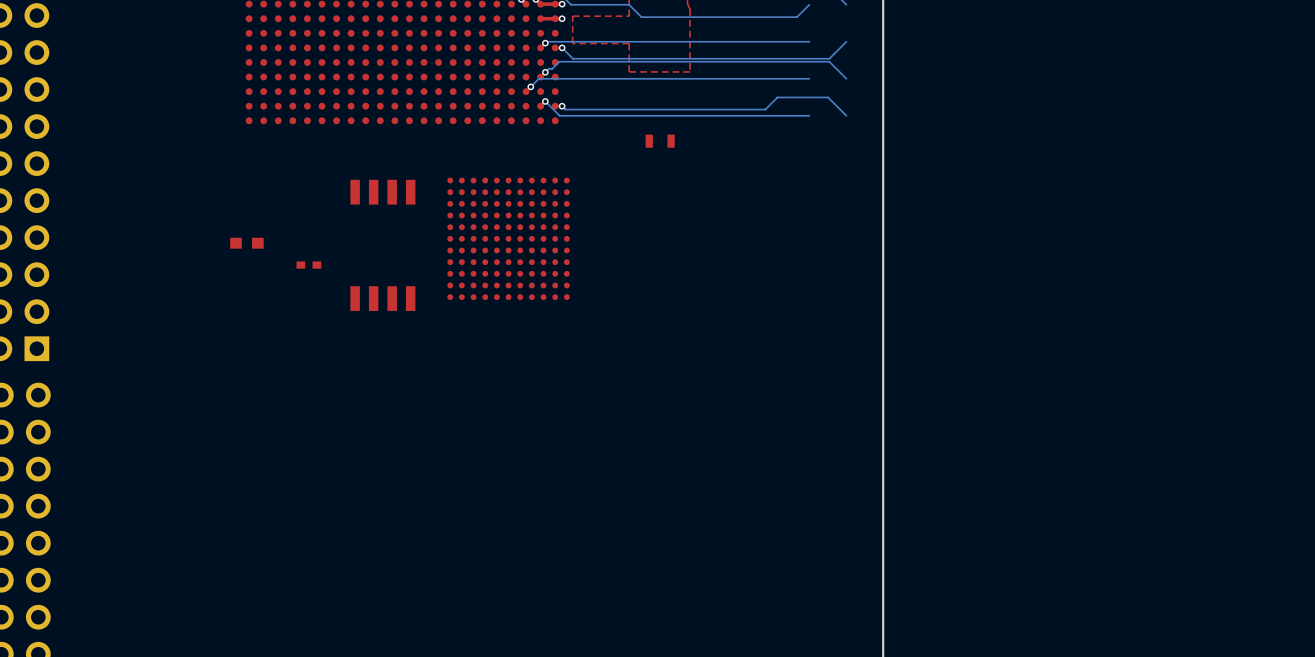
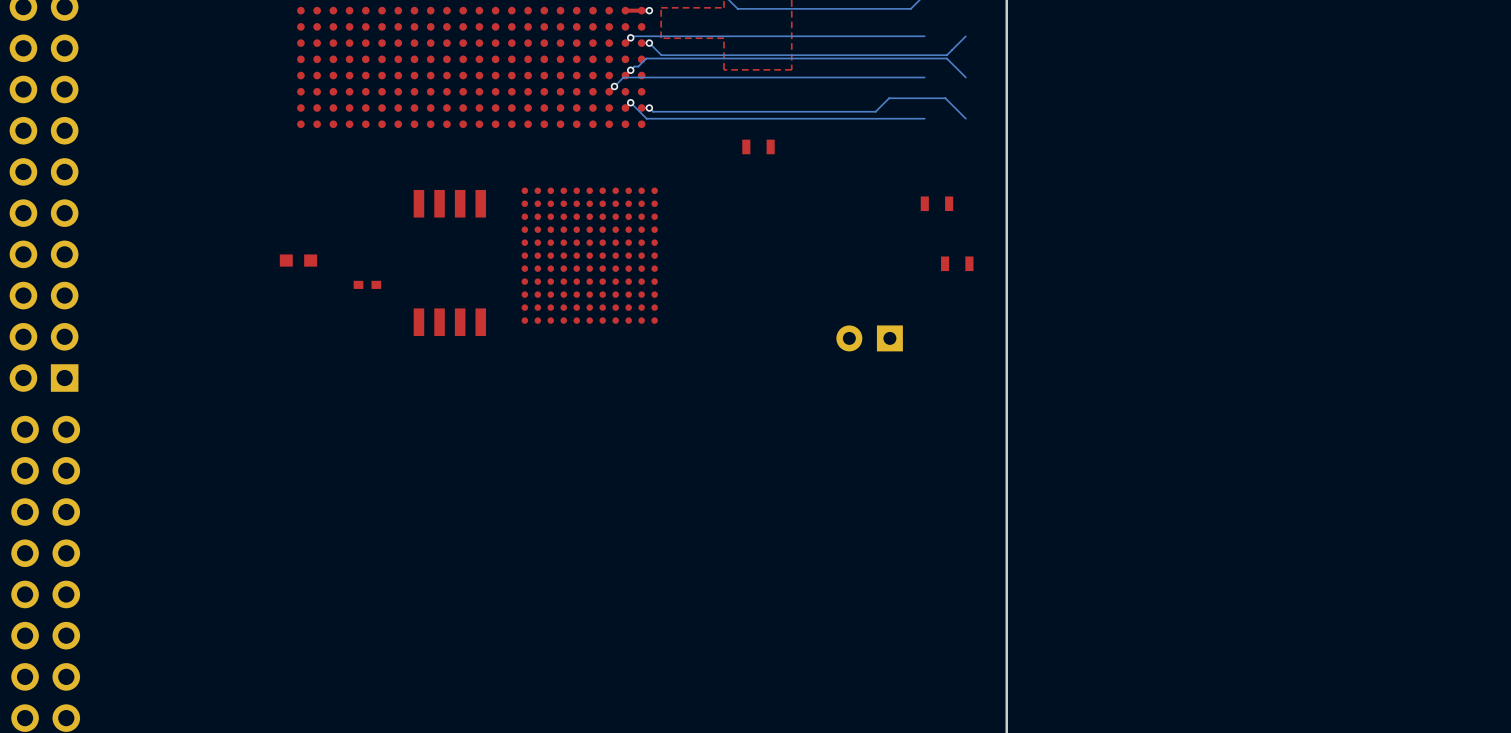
part: none -> (936, 203)
part: none -> (957, 263)
part: none -> (869, 338)

